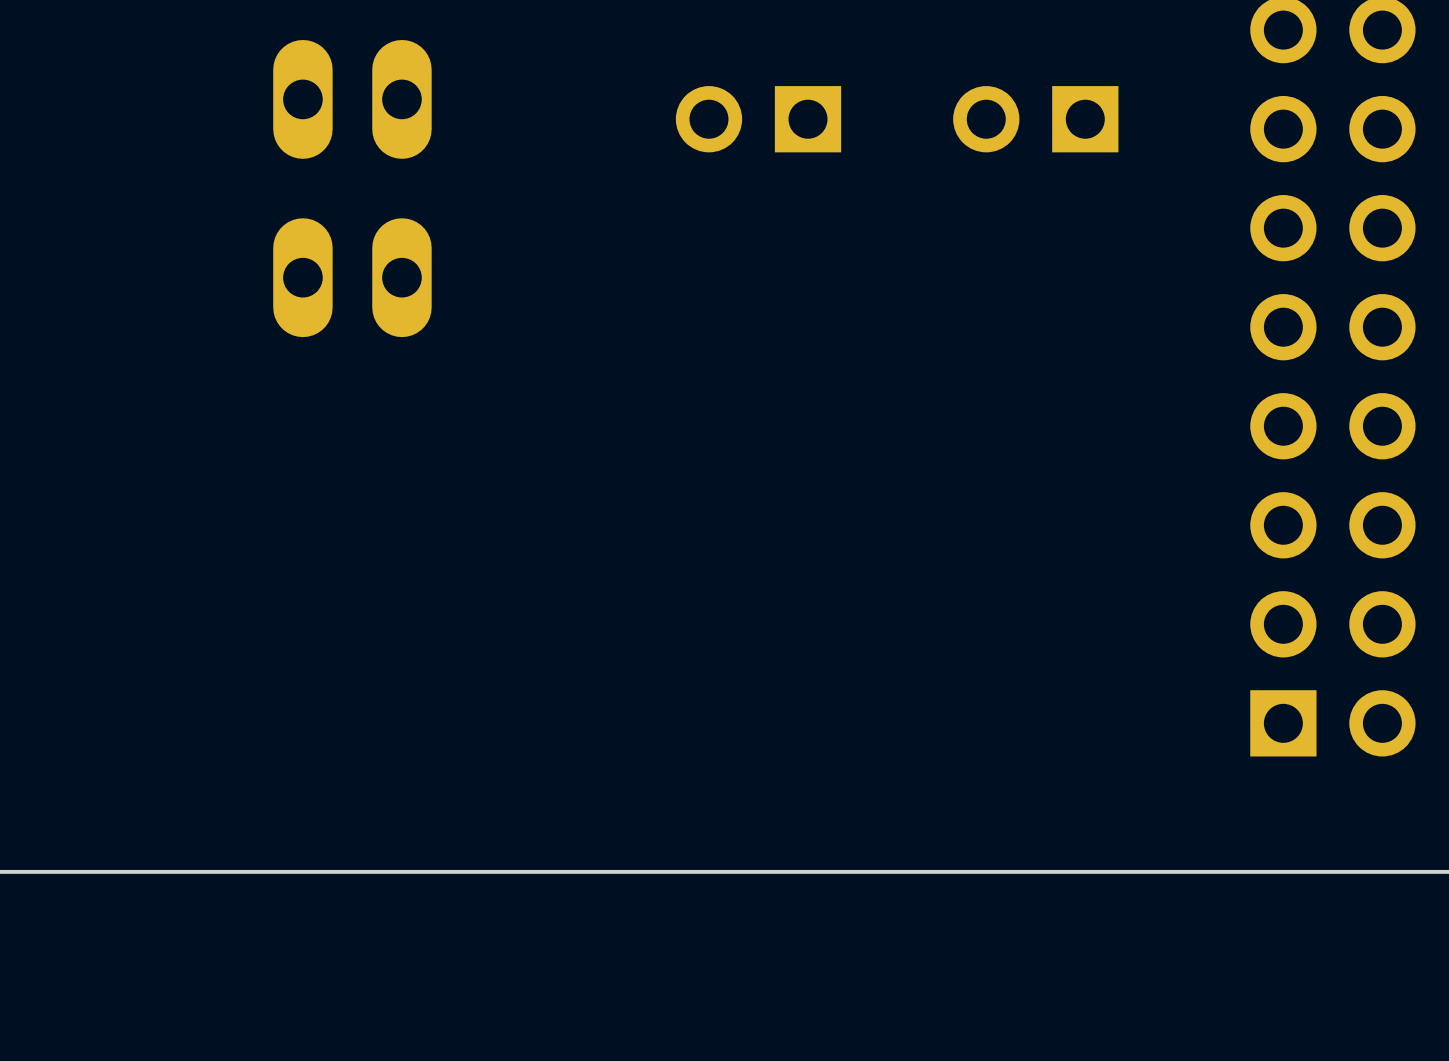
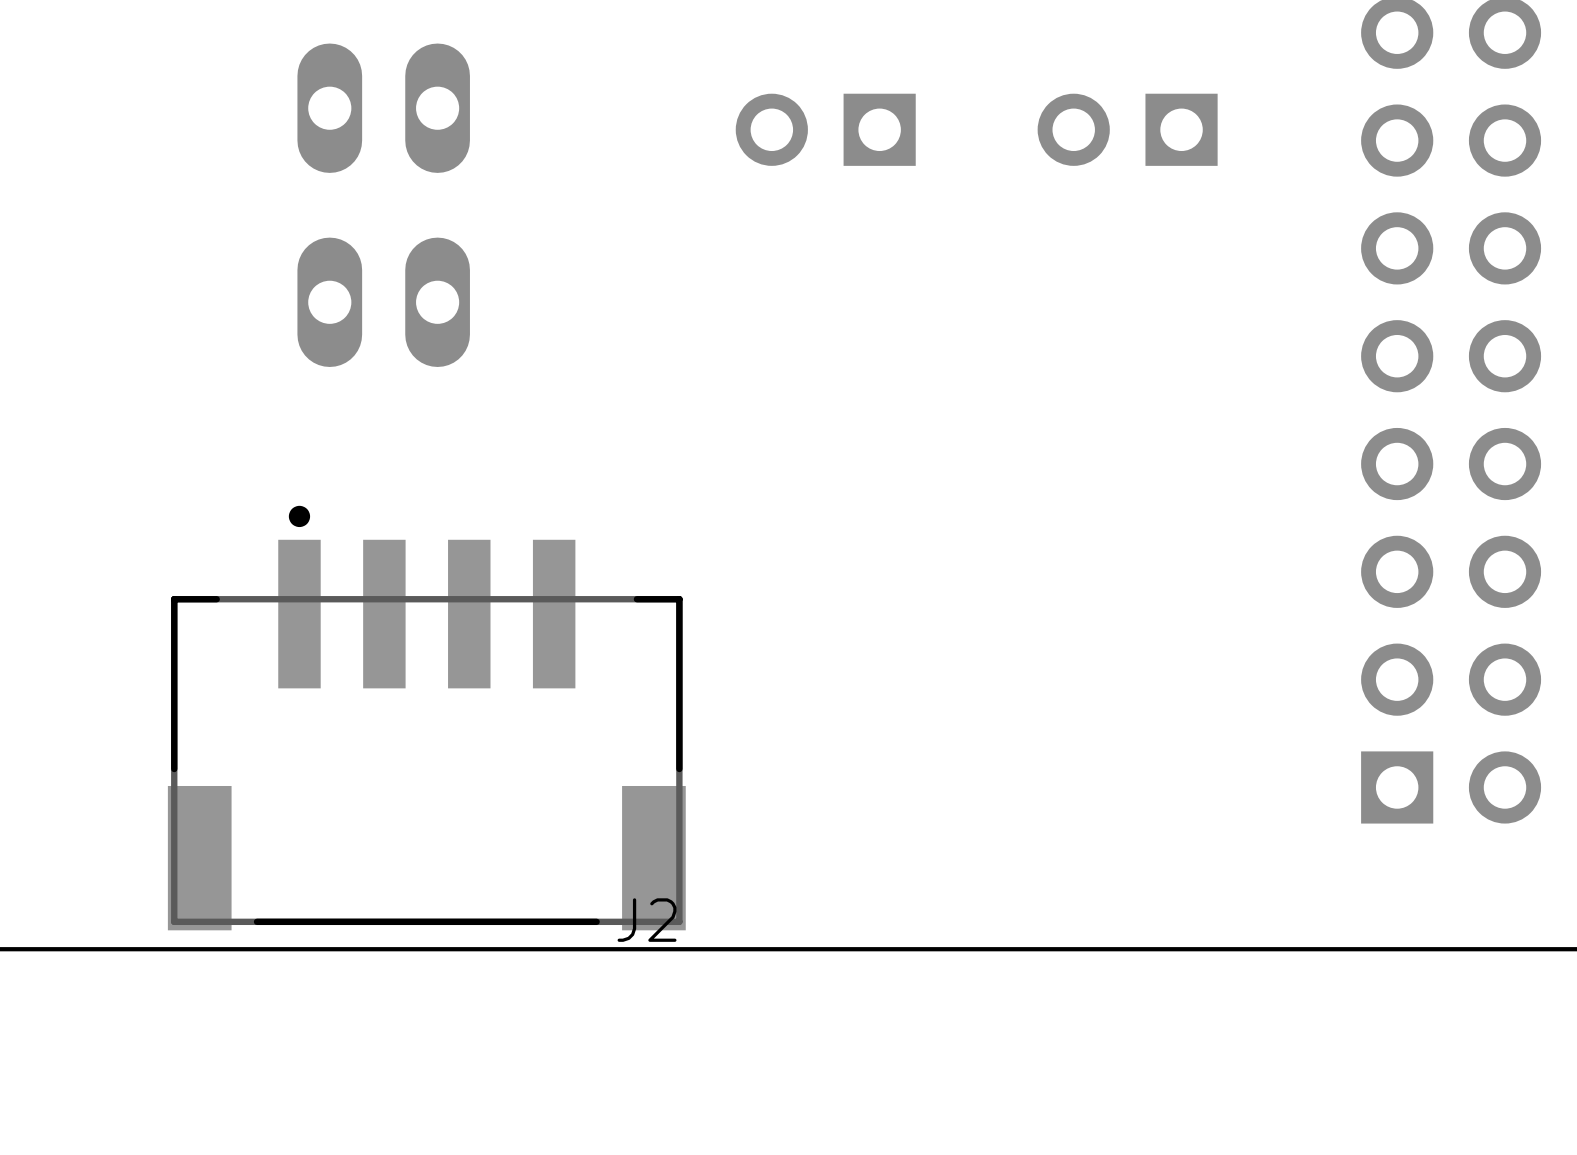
J2: none -> (426, 718)

